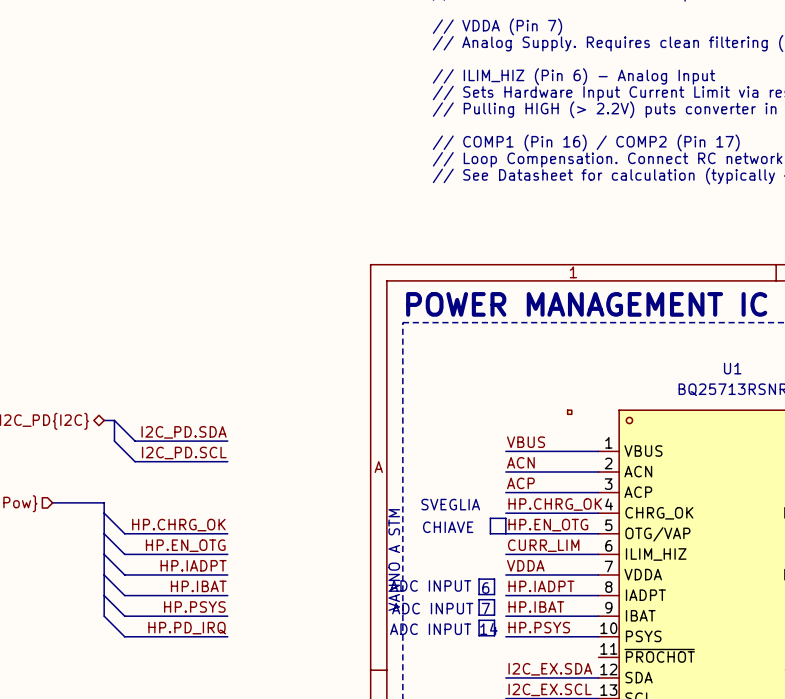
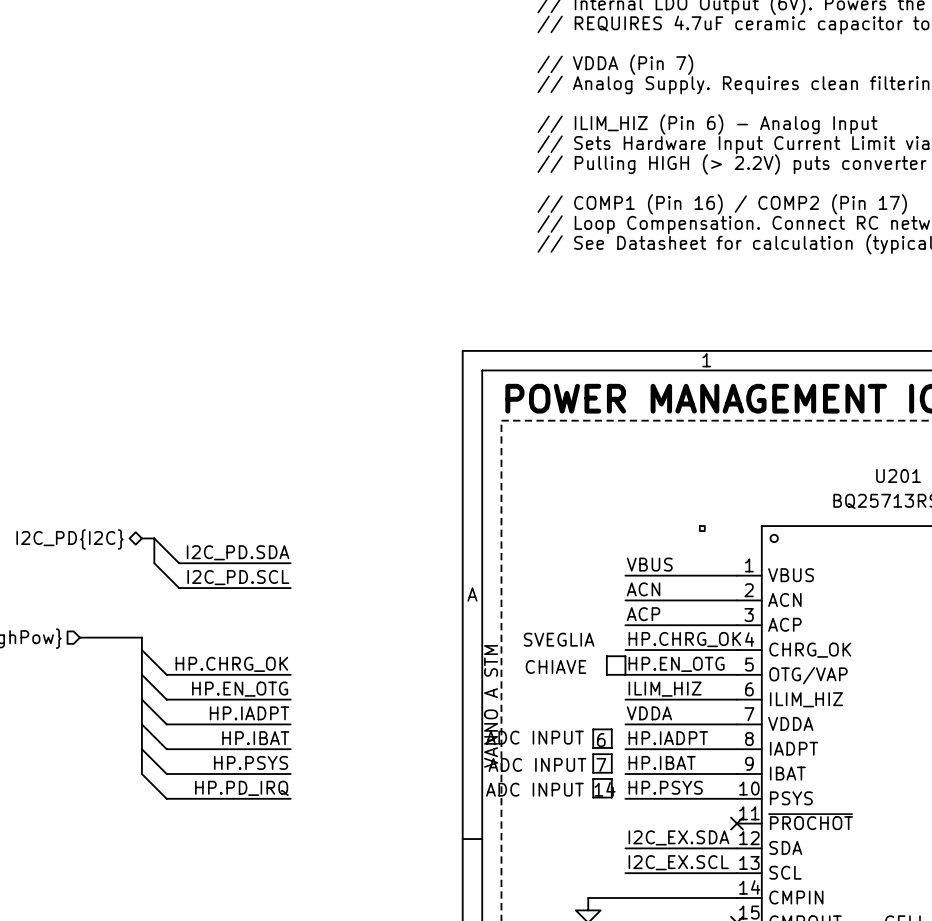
U1 name: U1 (732, 368) -> U201 (898, 476)
label: CURR_LIM (543, 545) -> ILIM_HIZ (665, 689)
no-connect mark: none -> (737, 823)

